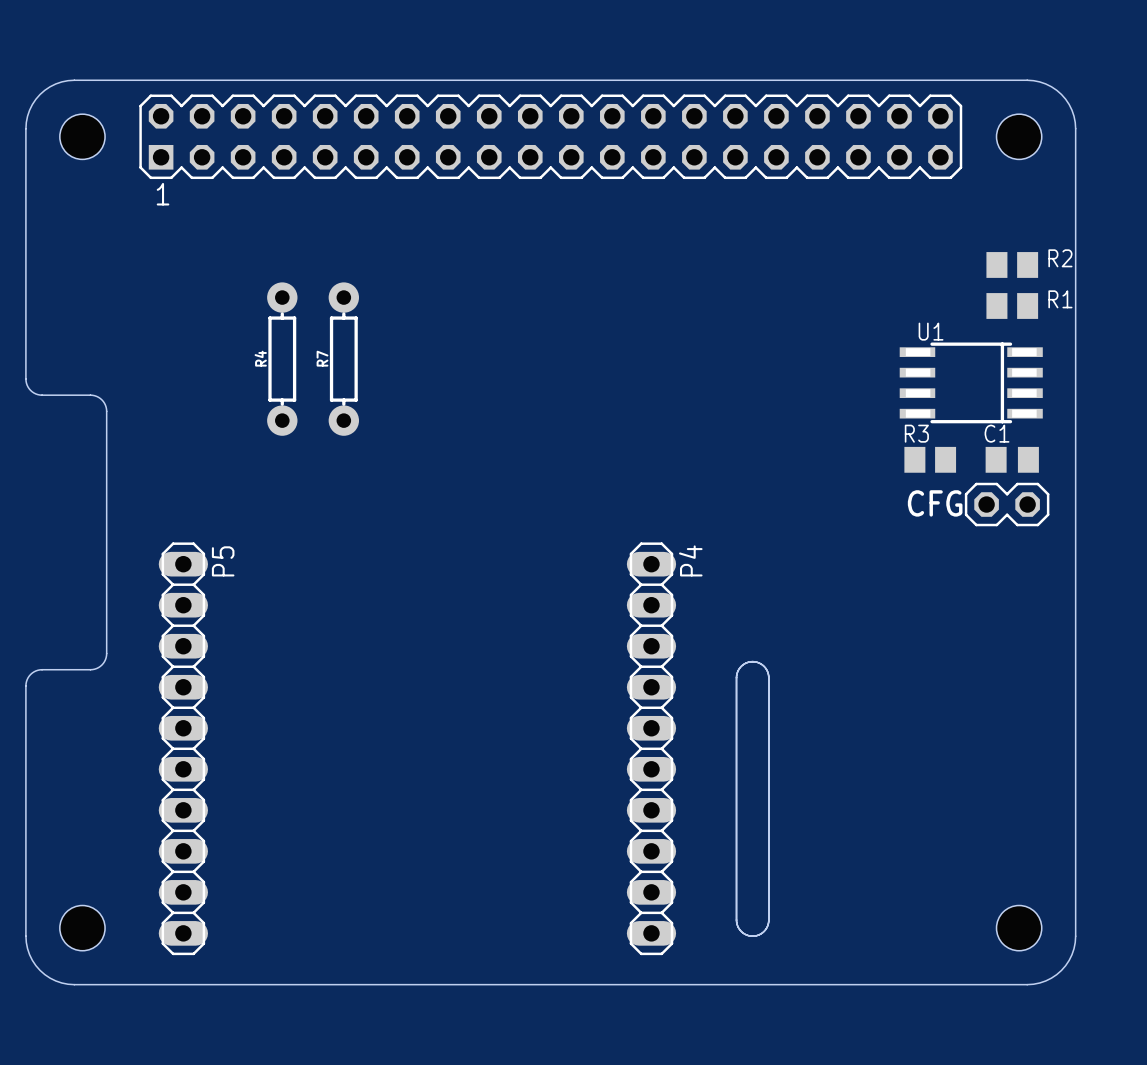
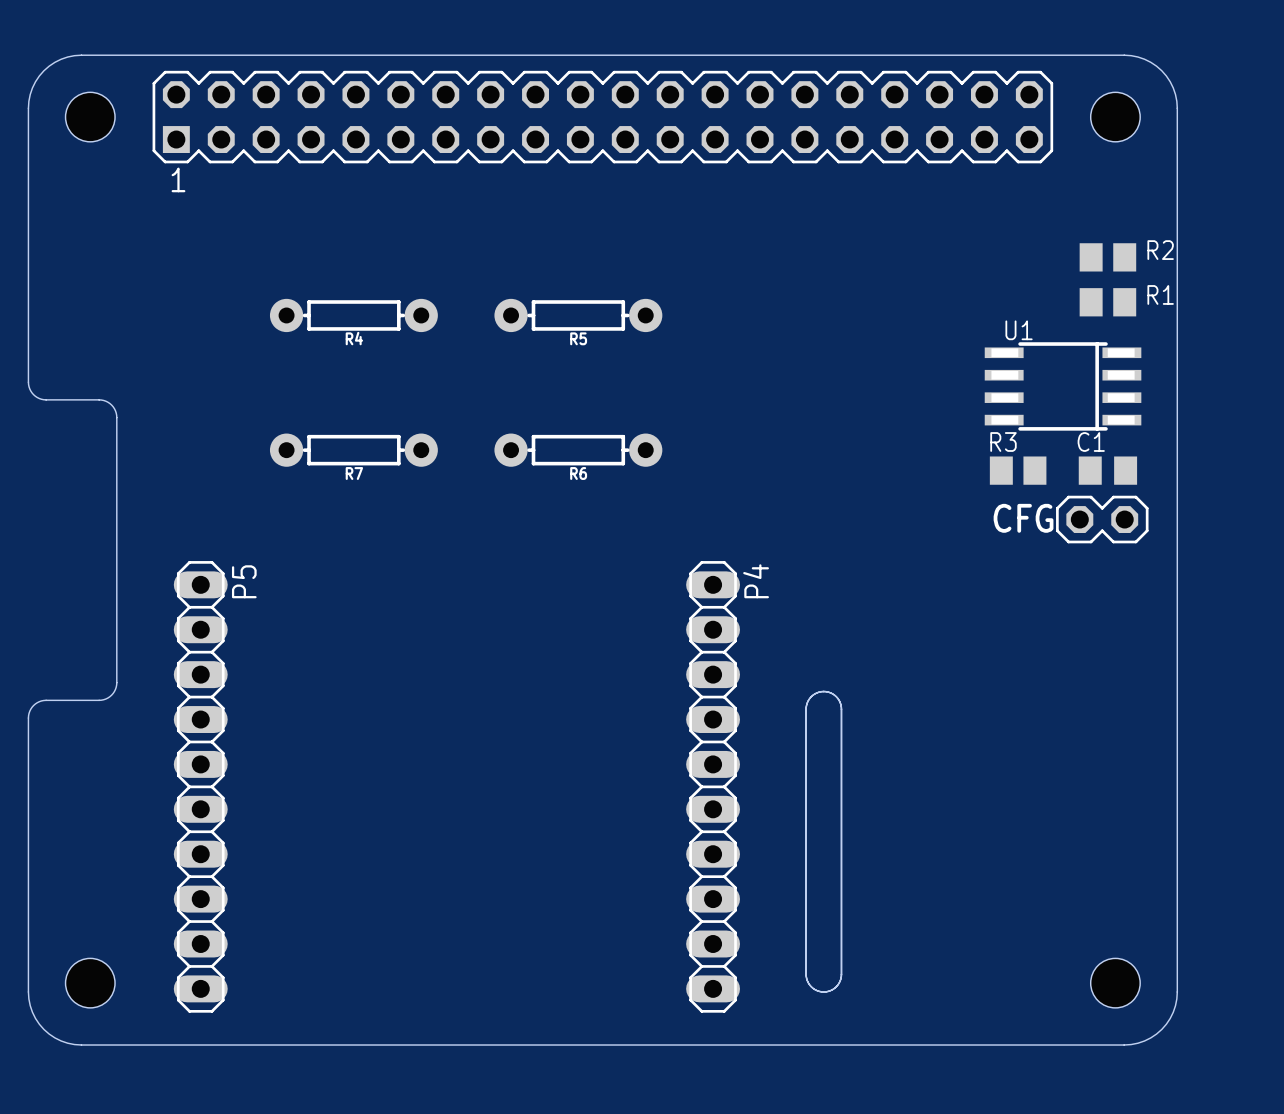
R5: none -> (578, 315)
R4 rotation: 0° (282, 359) -> 90° clockwise (353, 315)
R7 rotation: 0° (343, 359) -> 90° clockwise (353, 450)
R6: none -> (578, 450)

